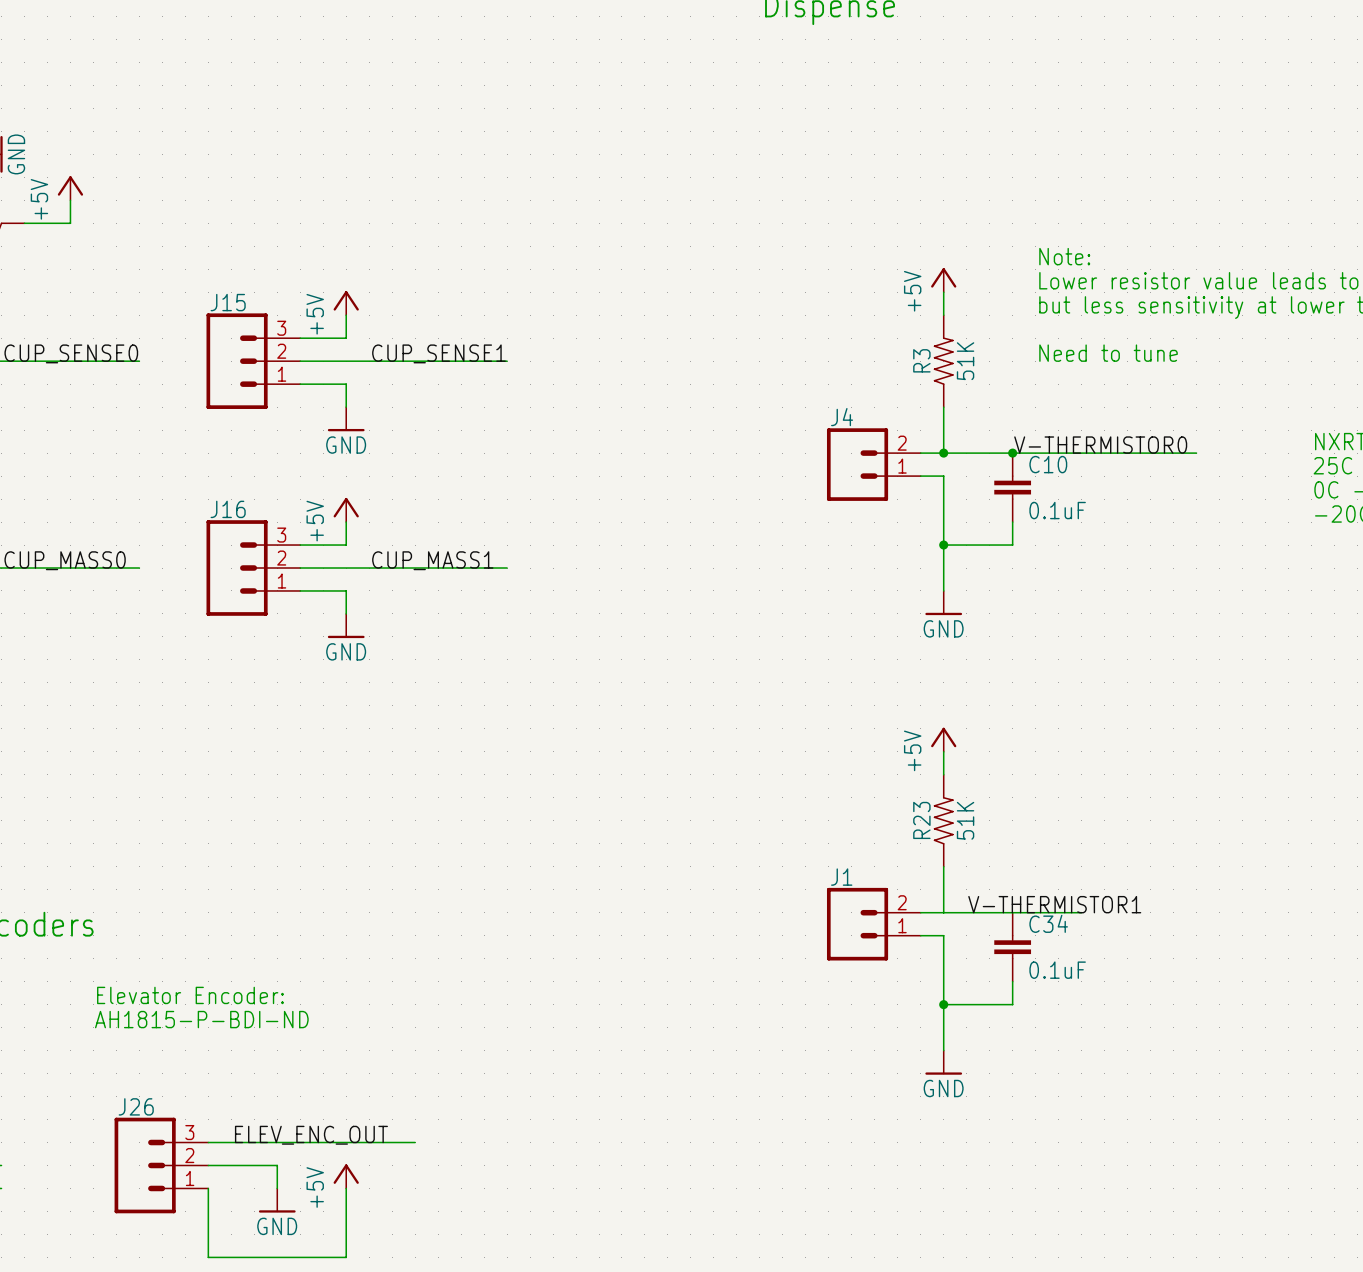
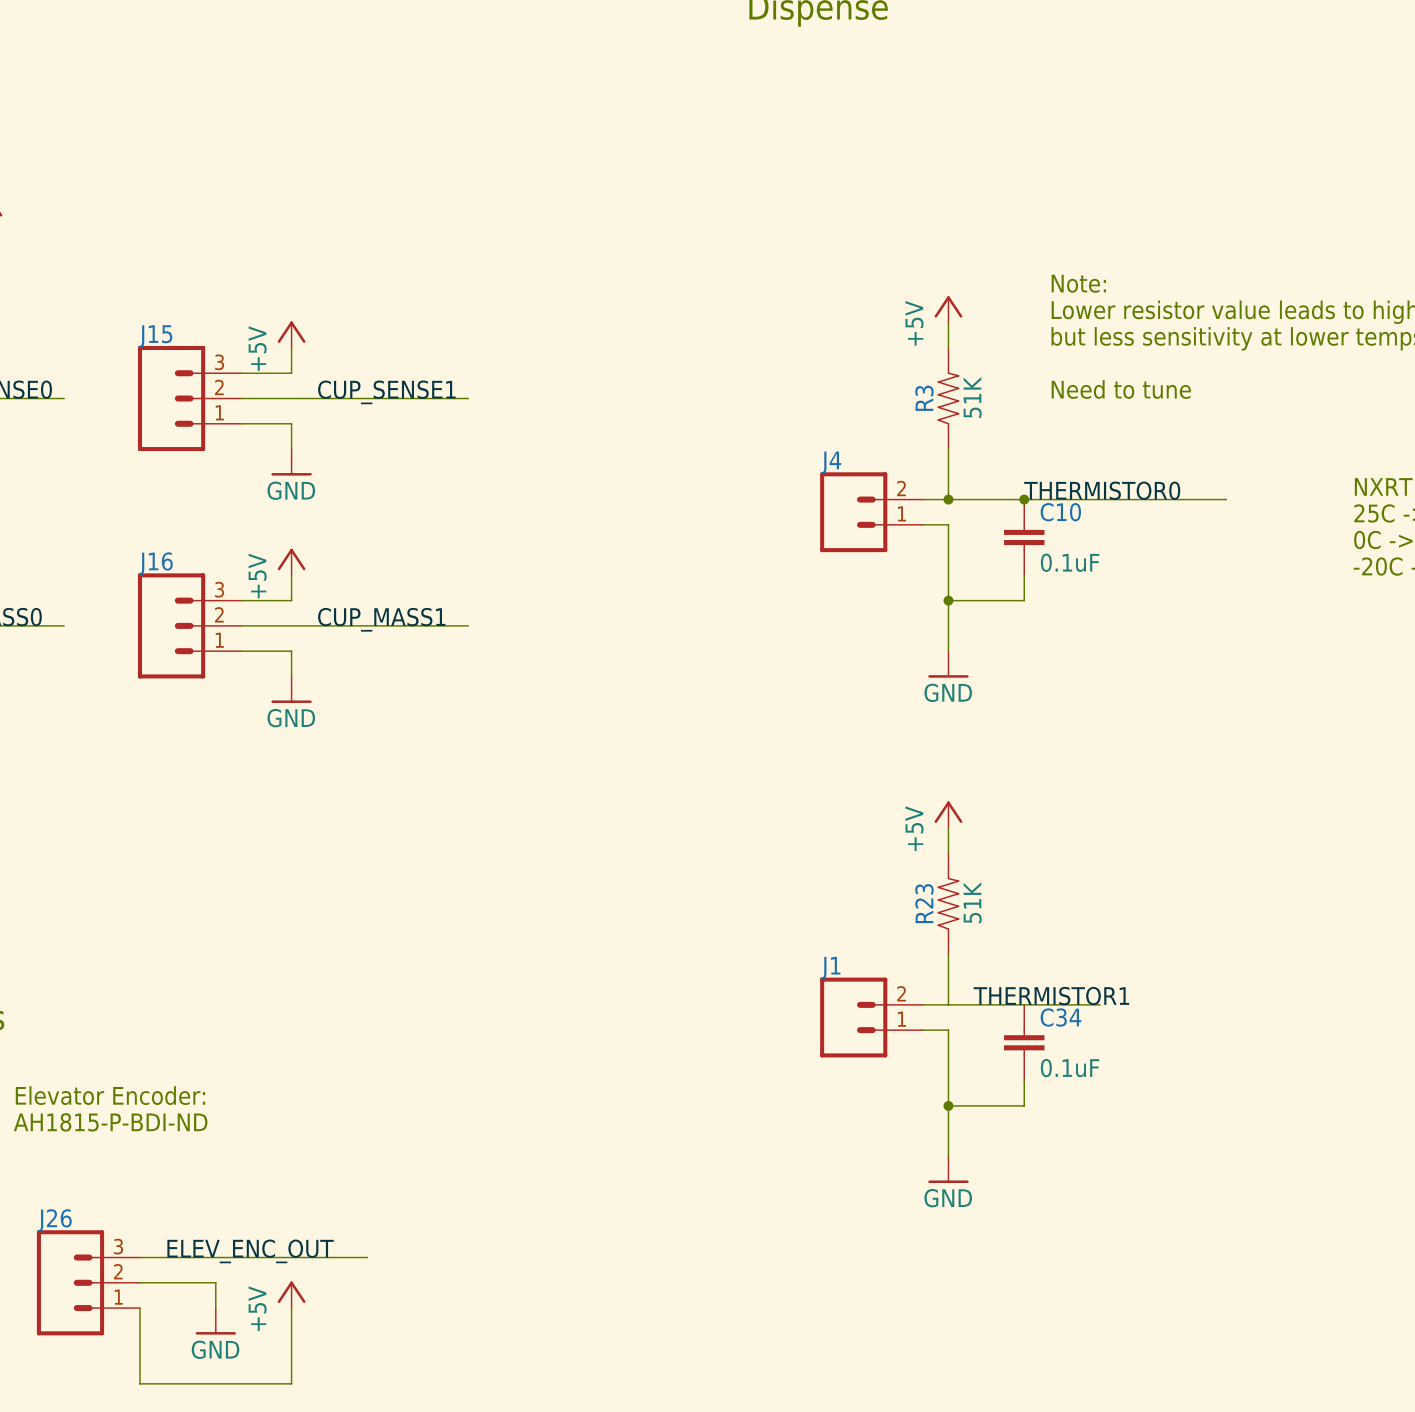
label: V-THERMISTOR0 (1100, 445) -> THERMISTOR0 (1102, 490)
label: V-THERMISTOR1 (1054, 904) -> THERMISTOR1 (1051, 996)

